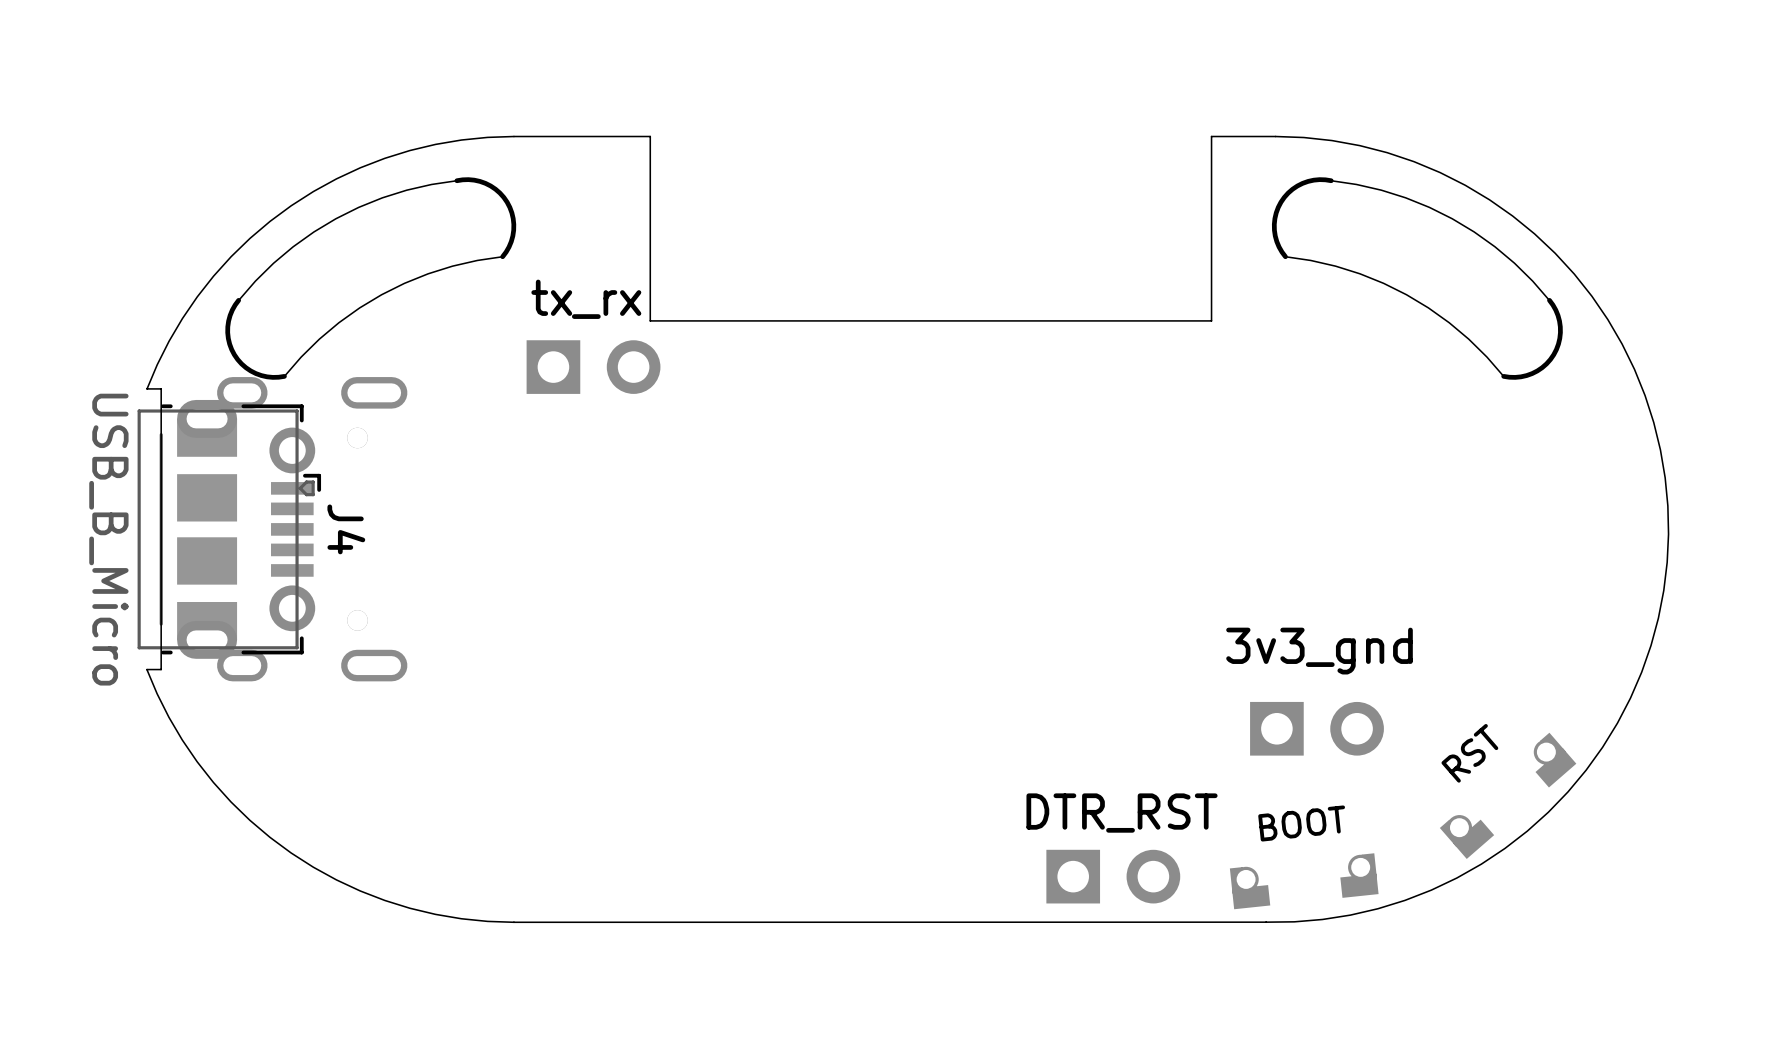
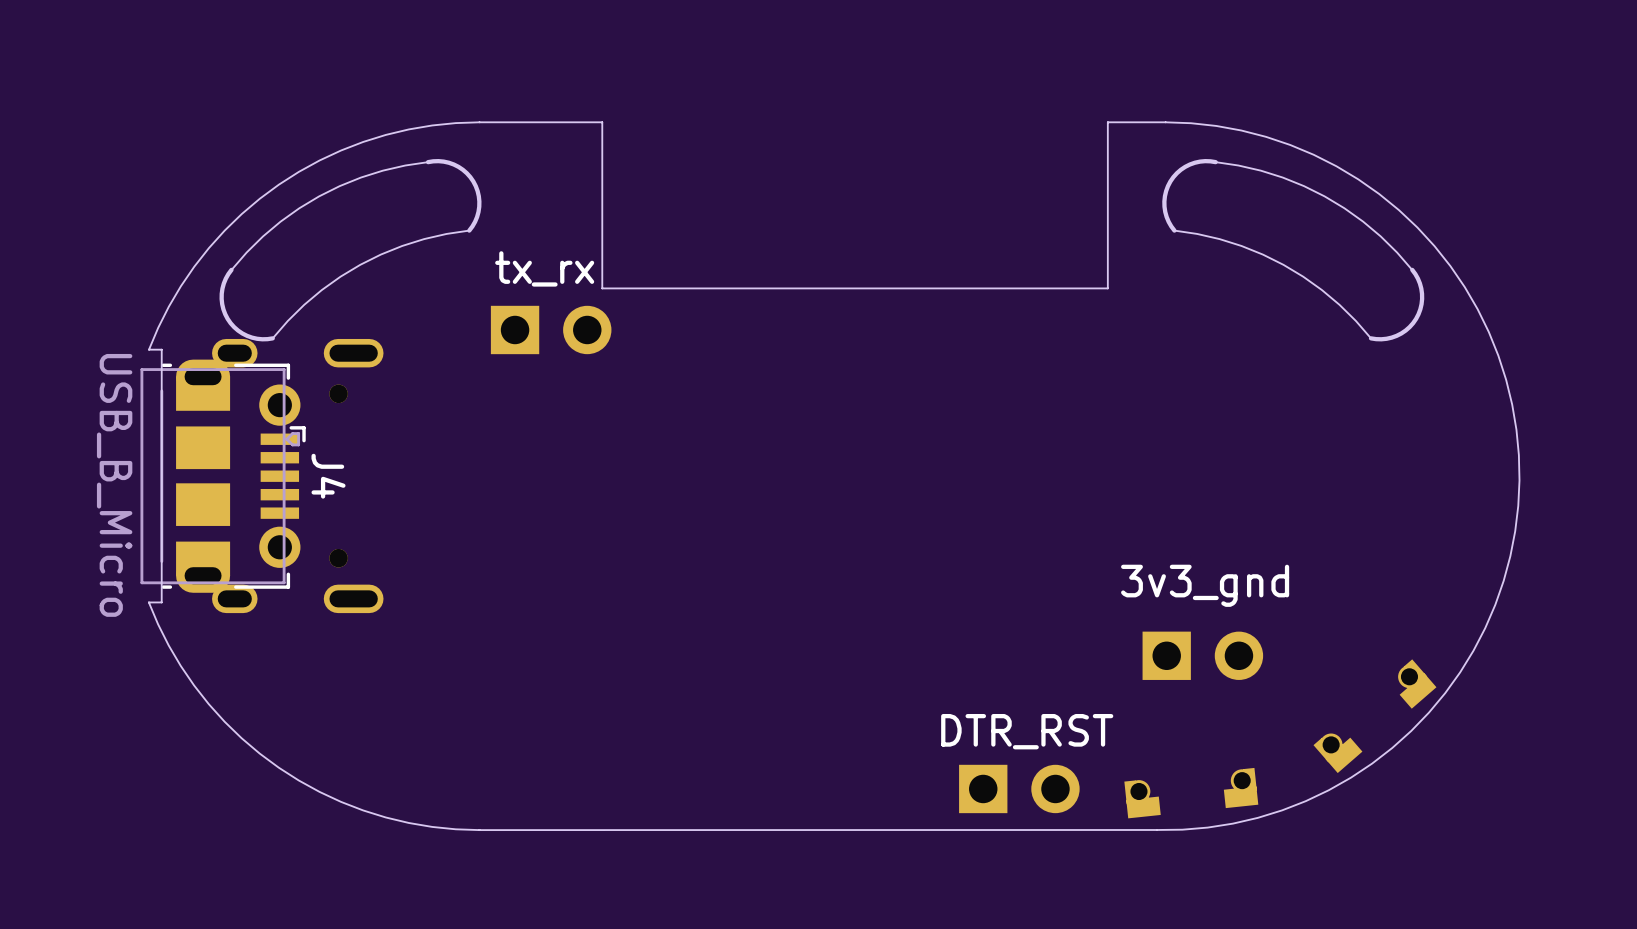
text: RST (1469, 753) -> none
text: BOOT (1301, 823) -> none

